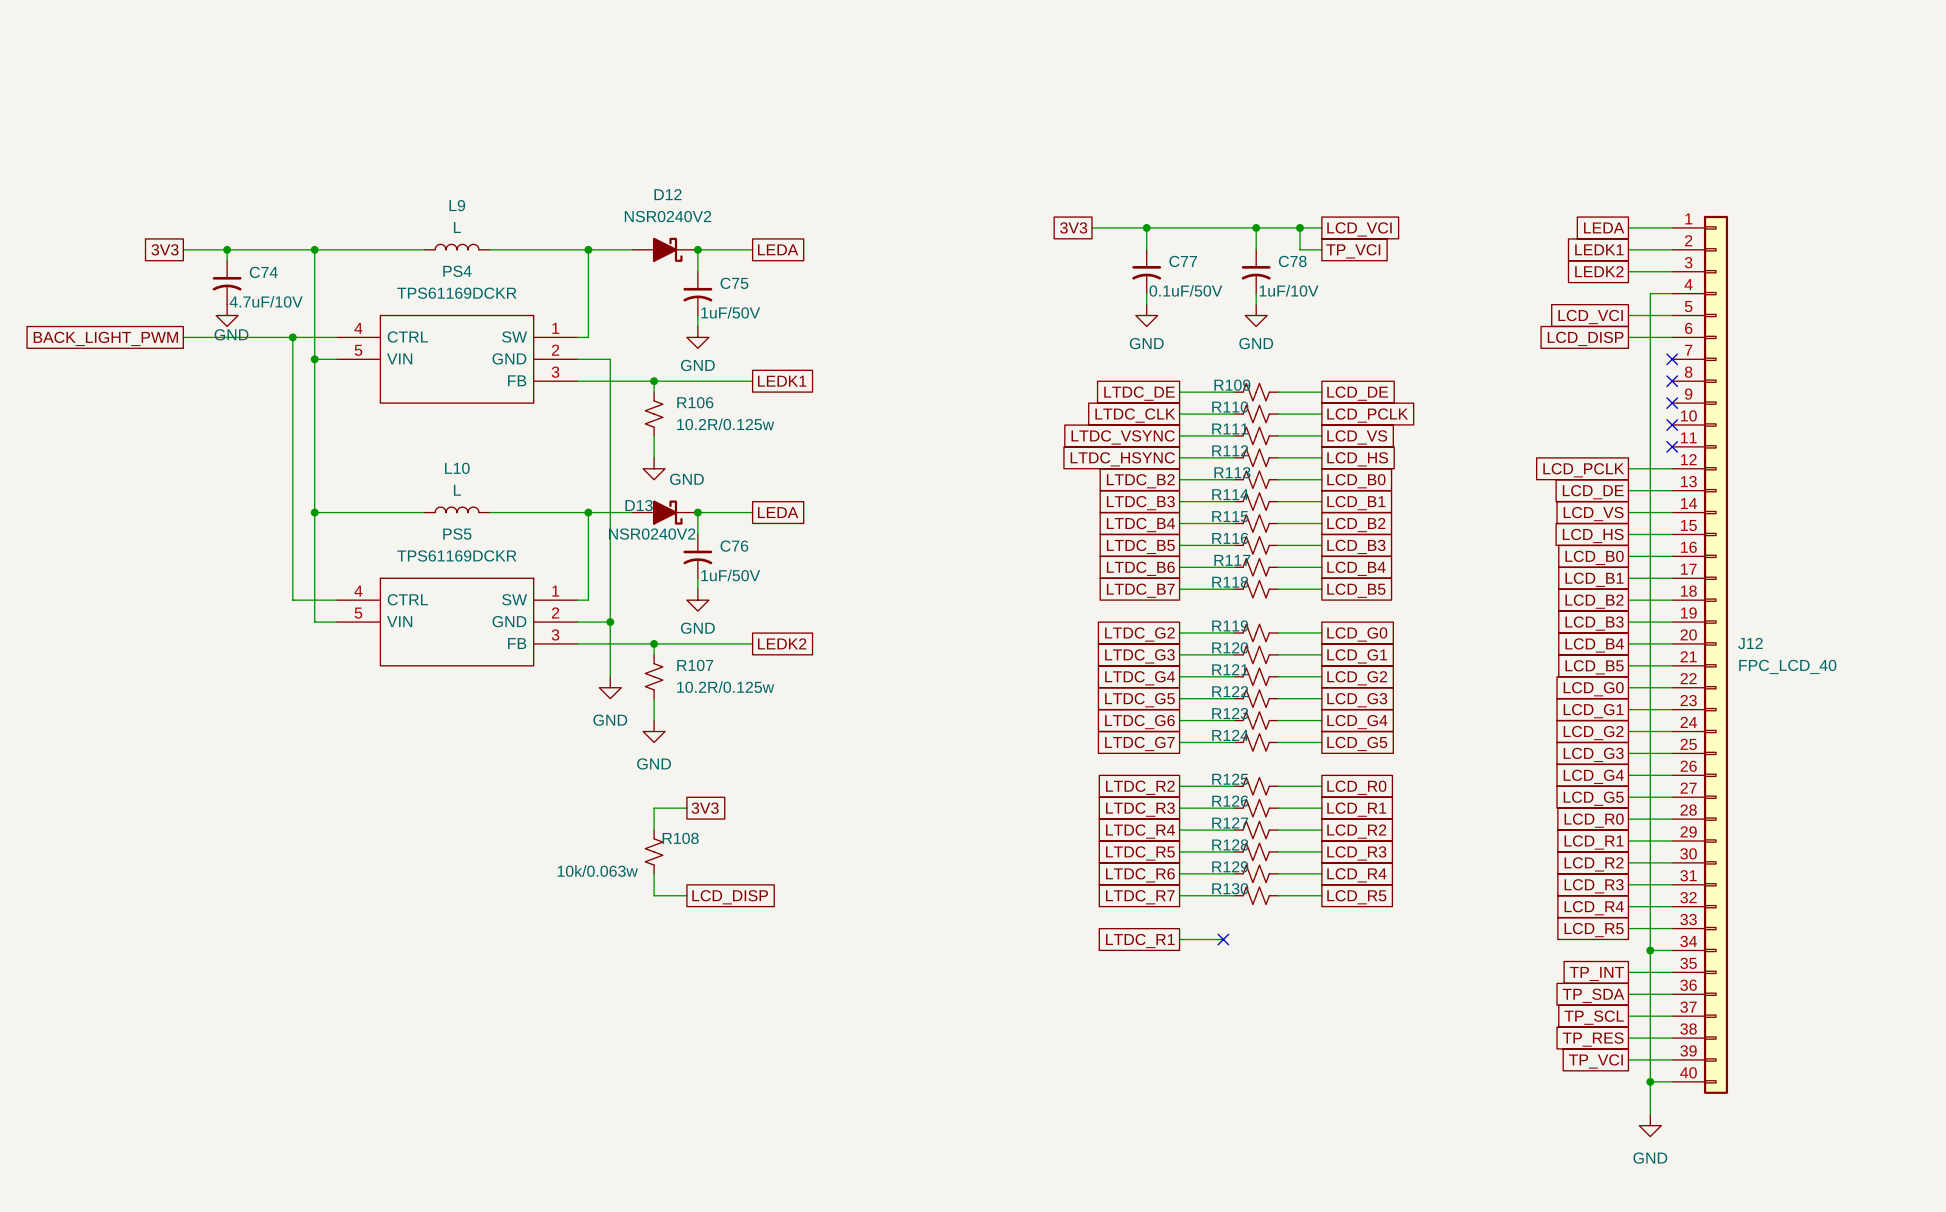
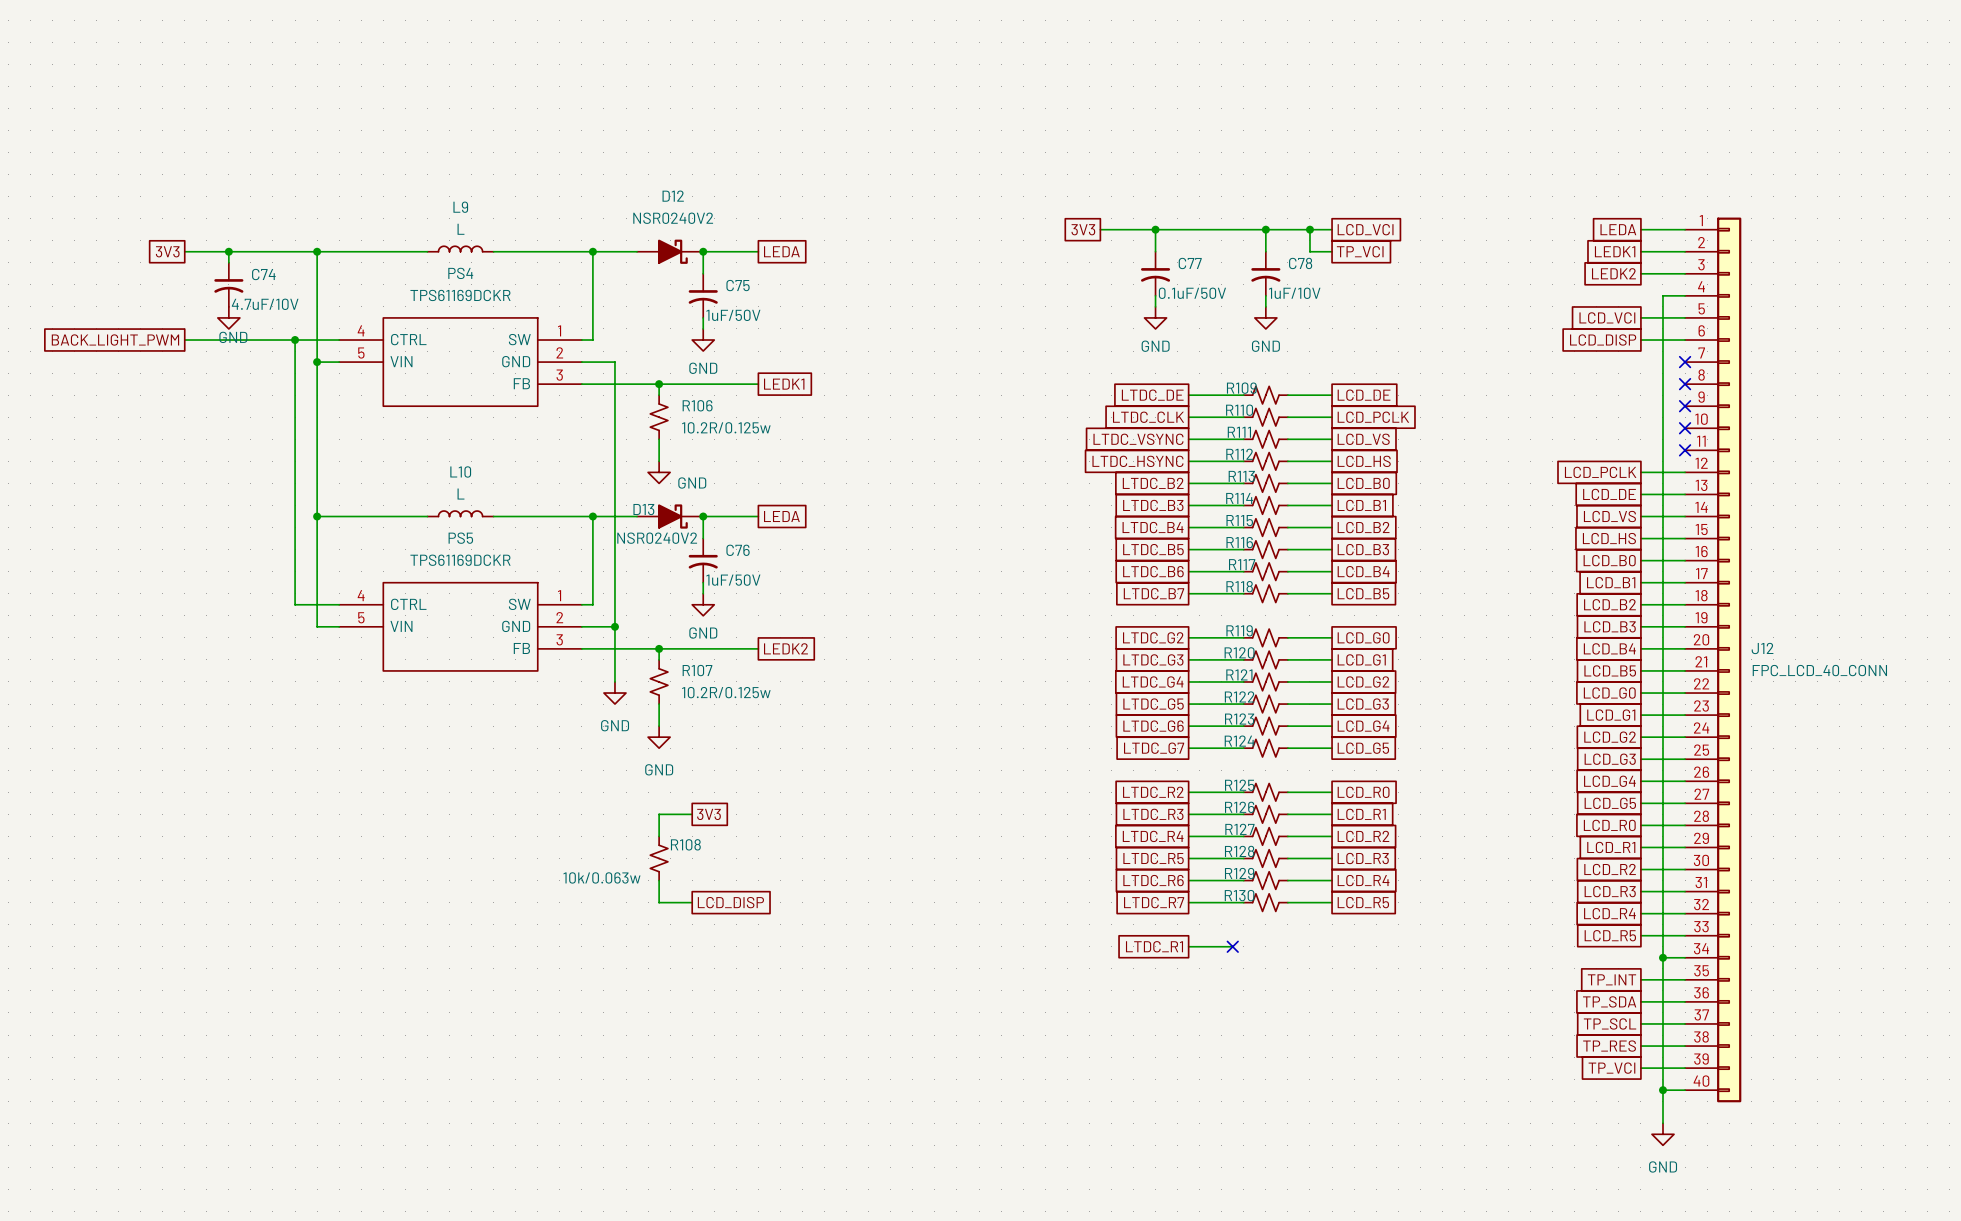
J12 value: FPC_LCD_40 (1787, 666) -> FPC_LCD_40_CONN (1819, 670)

